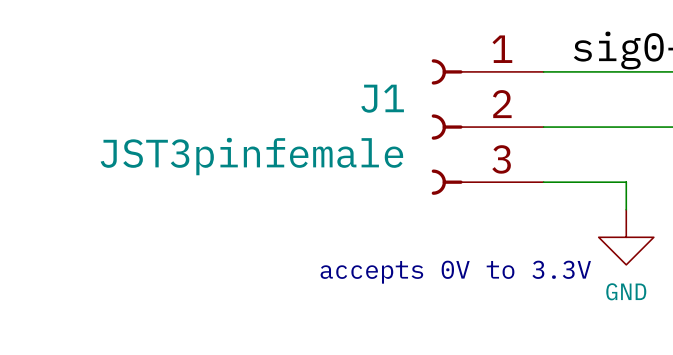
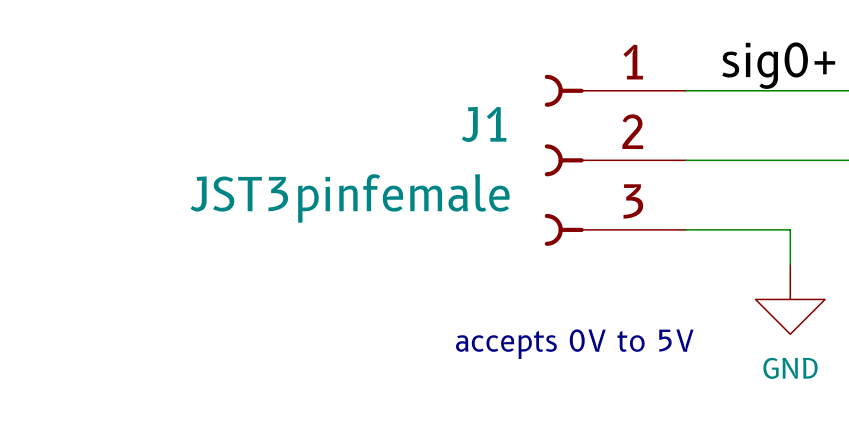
text: accepts 0V to 3.3V (455, 272) -> accepts 0V to 5V (574, 344)

